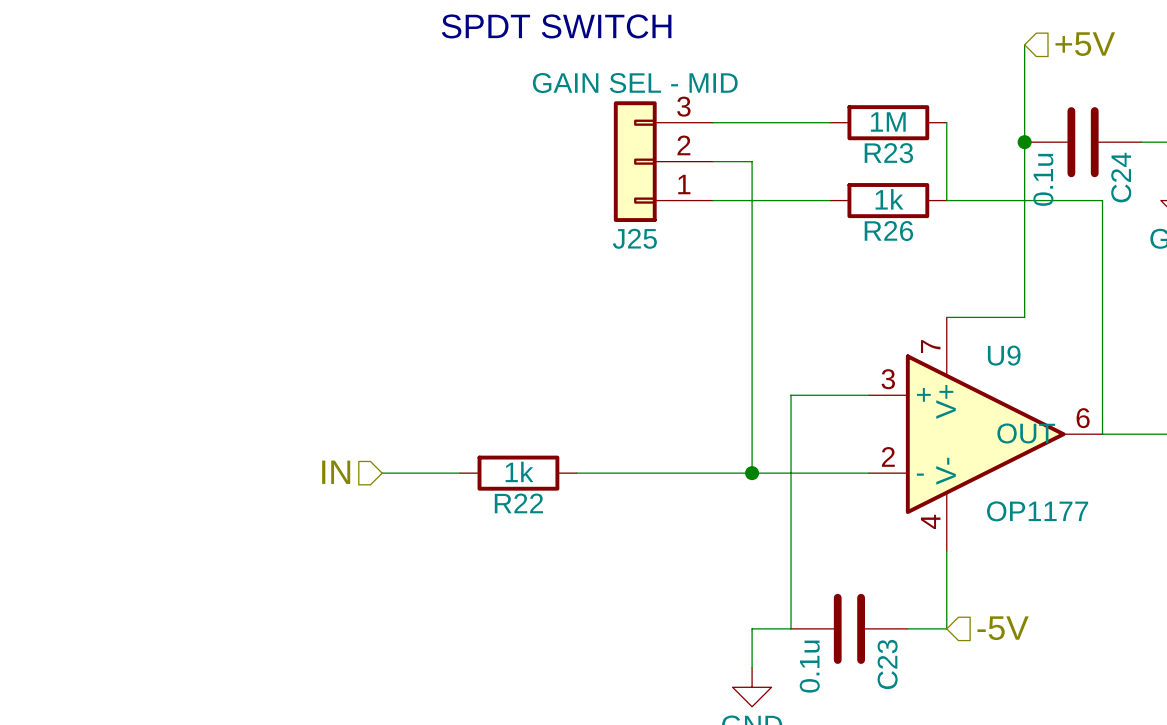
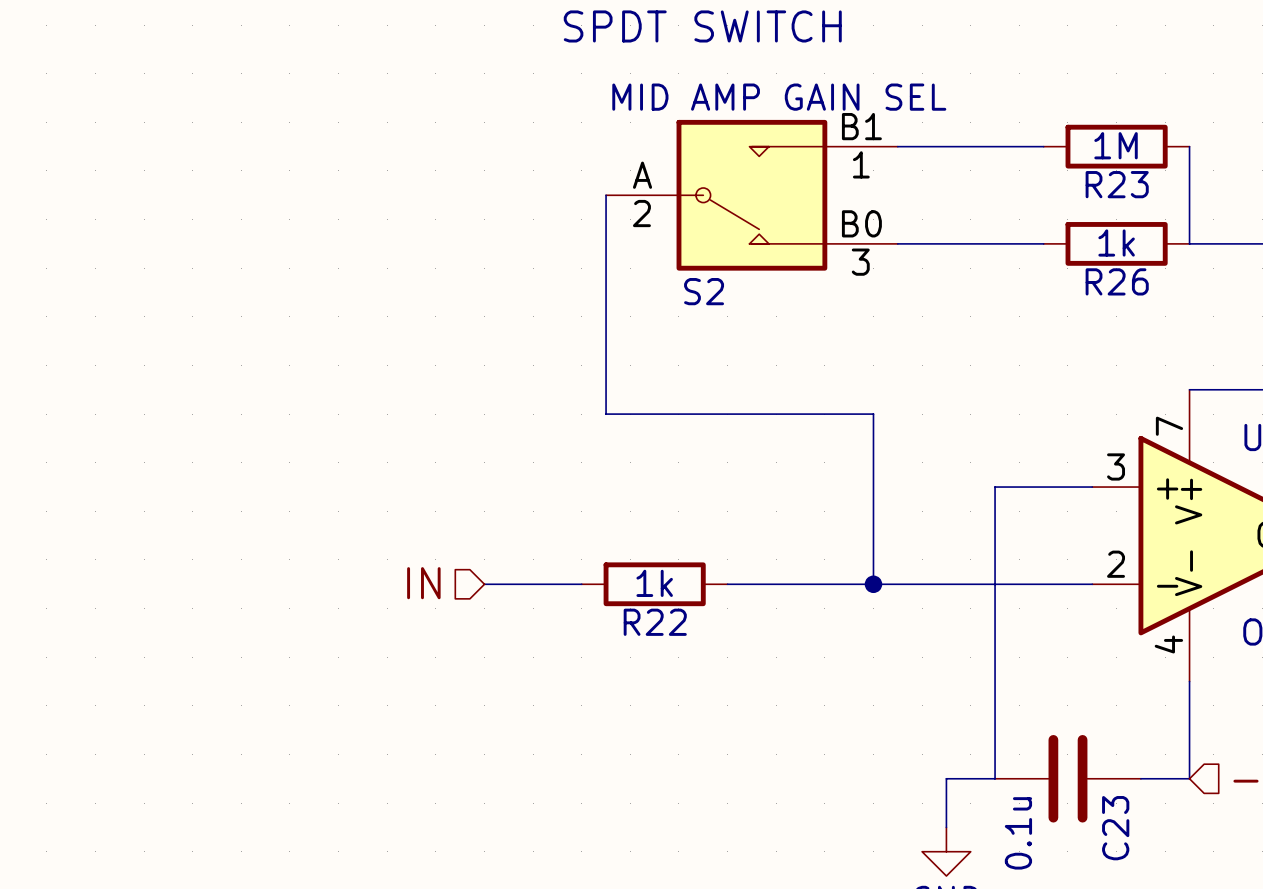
wire: none -> (606, 195) (606, 414) (873, 414) (873, 584)
S2: none -> MID AMP GAIN SEL (751, 195)
J25: GAIN SEL - MID (663, 161) -> none
wire: (713, 161) (752, 161) (752, 473) -> none
junction position: (752, 473) -> (873, 584)

